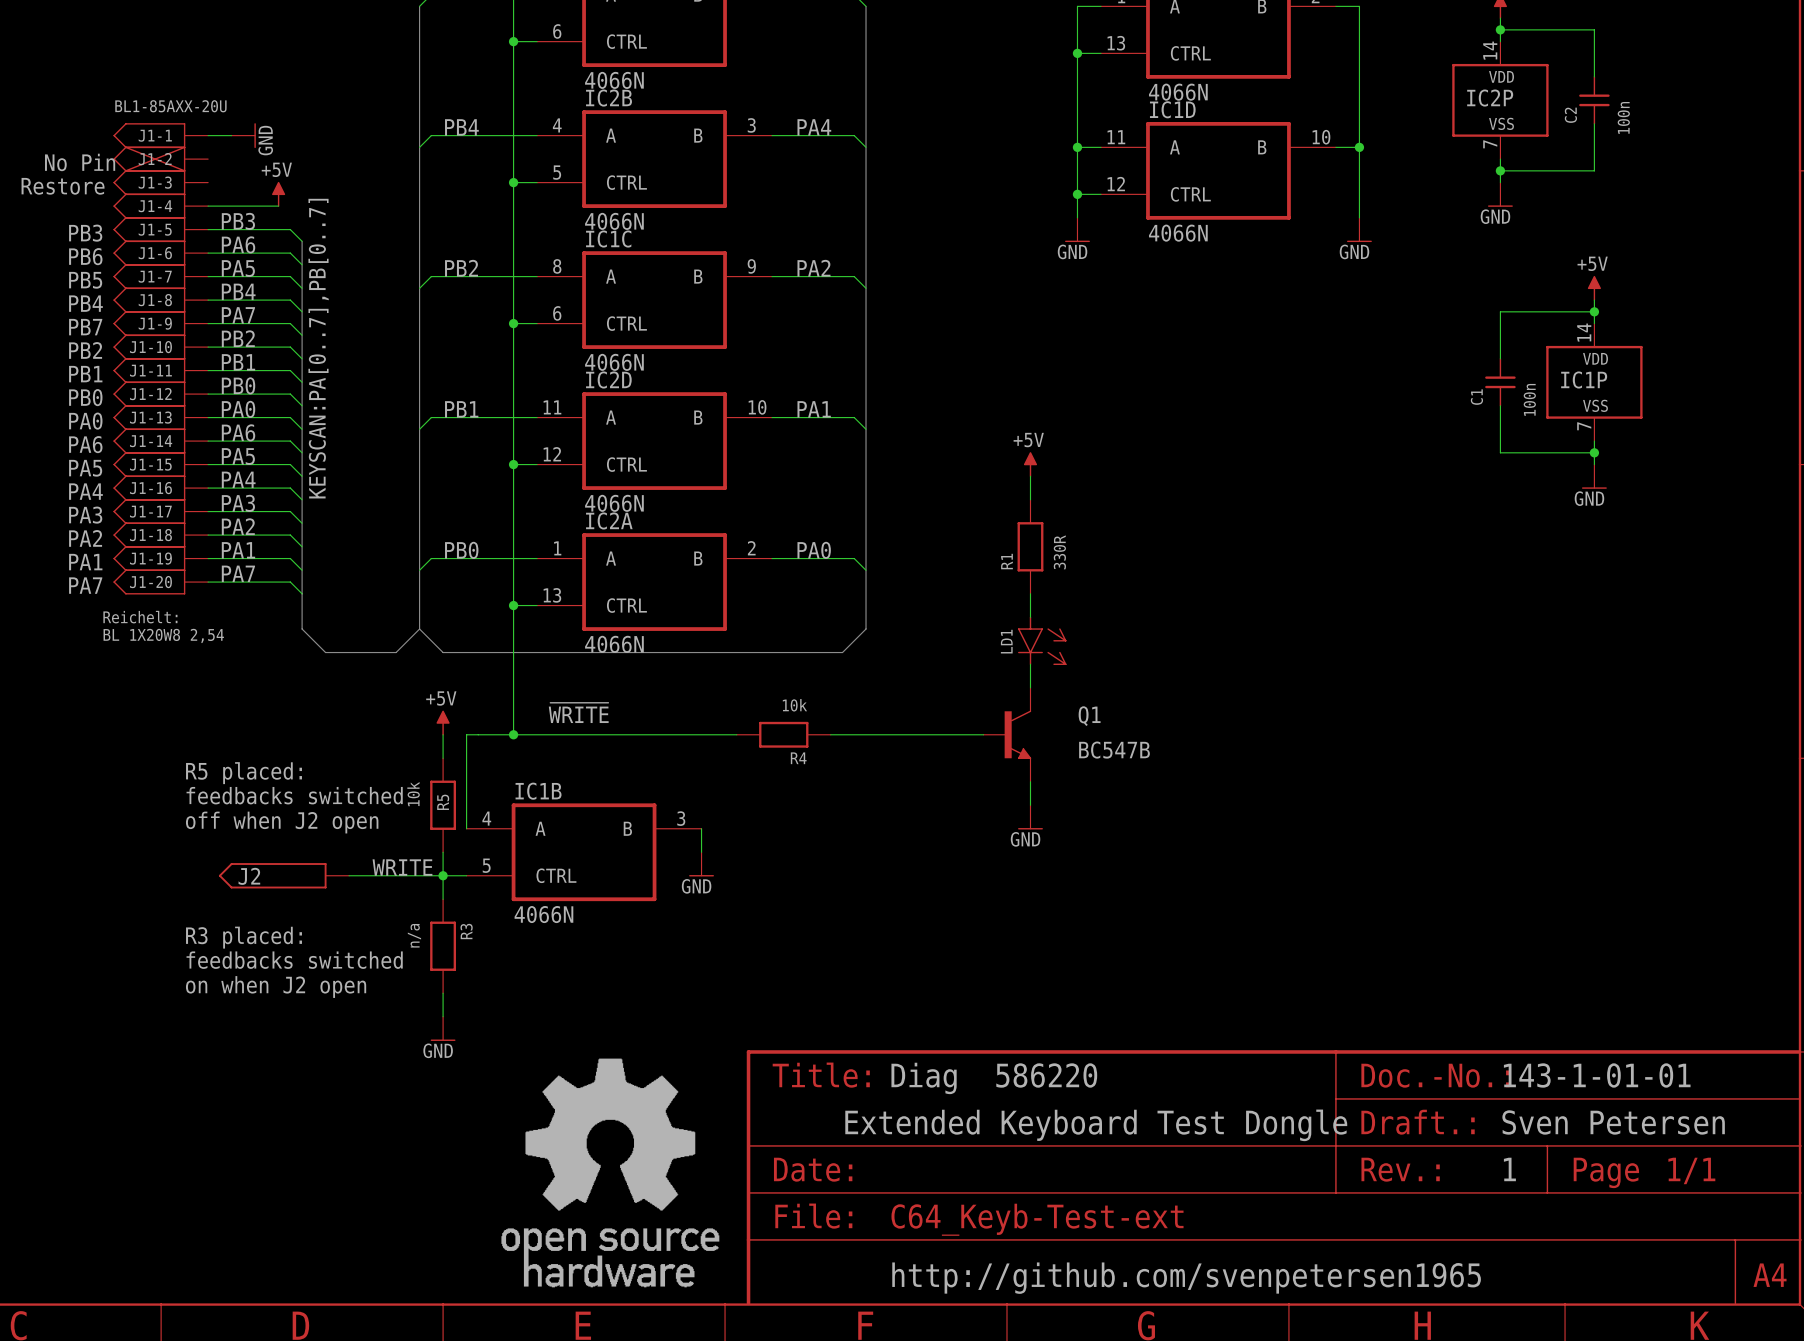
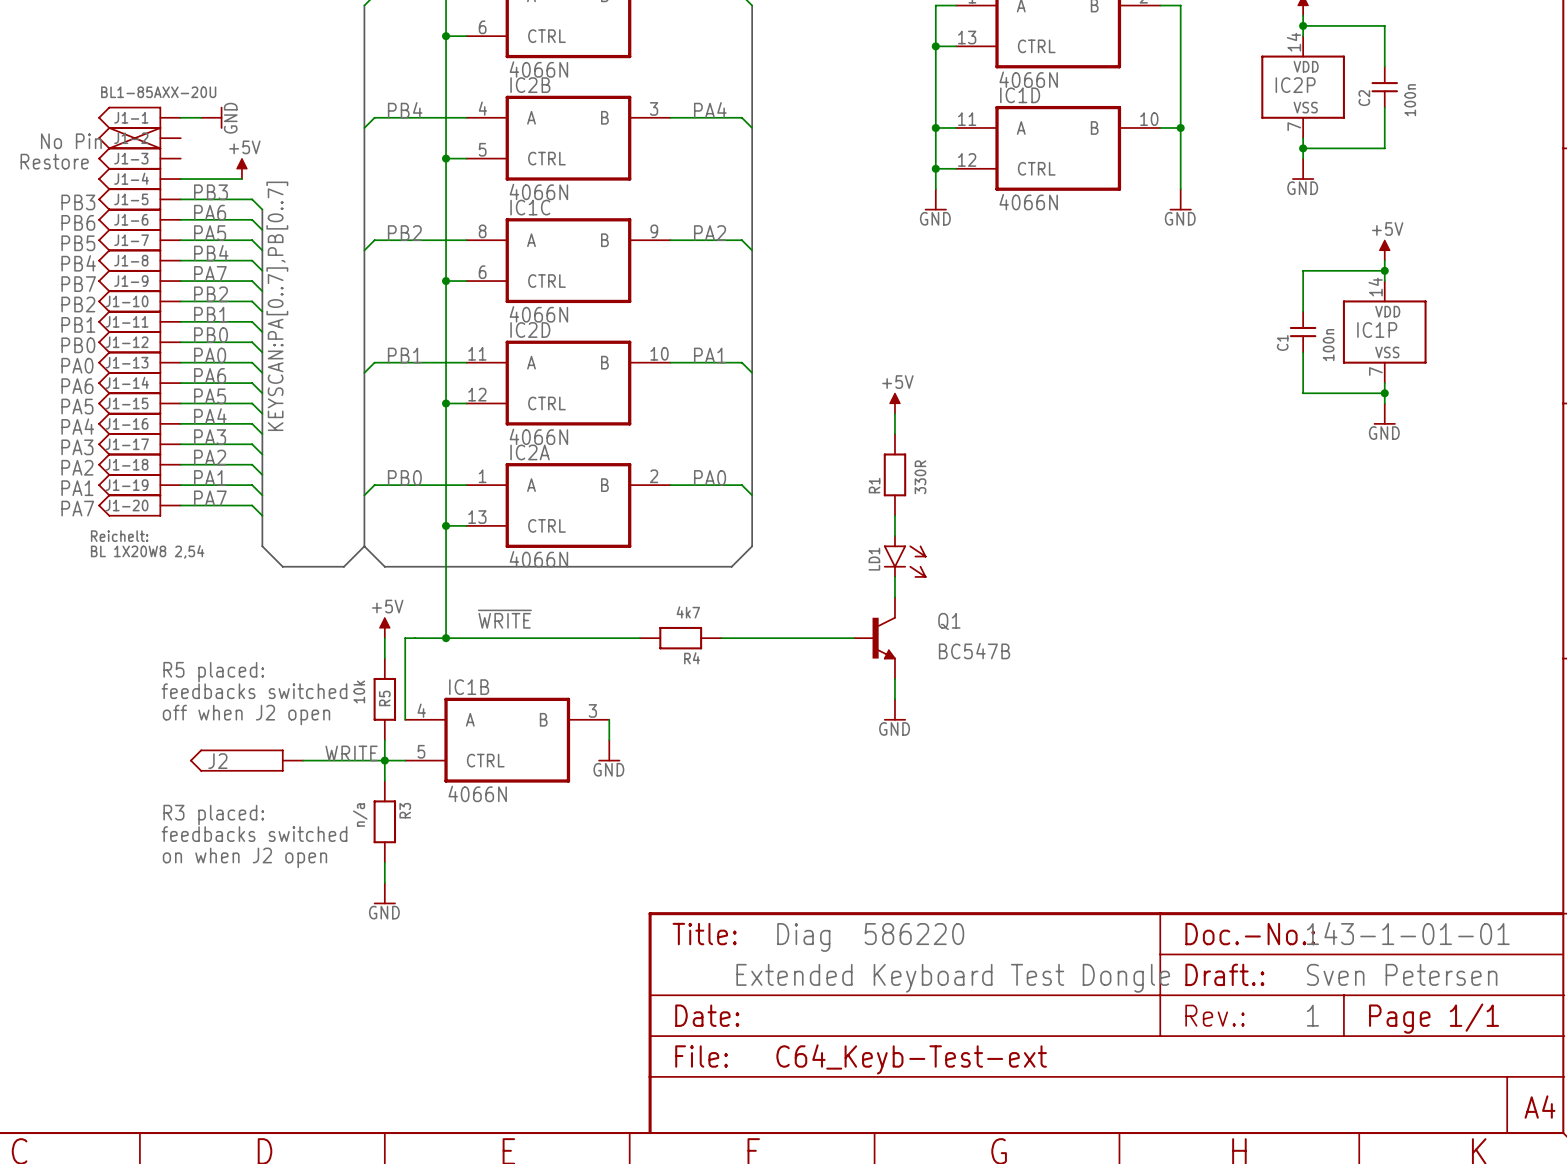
R4 value: 10k (794, 705) -> 4k7 (688, 612)
part: (610, 1172) -> none
text: http://github.com/svenpetersen1965 (1186, 1278) -> none

